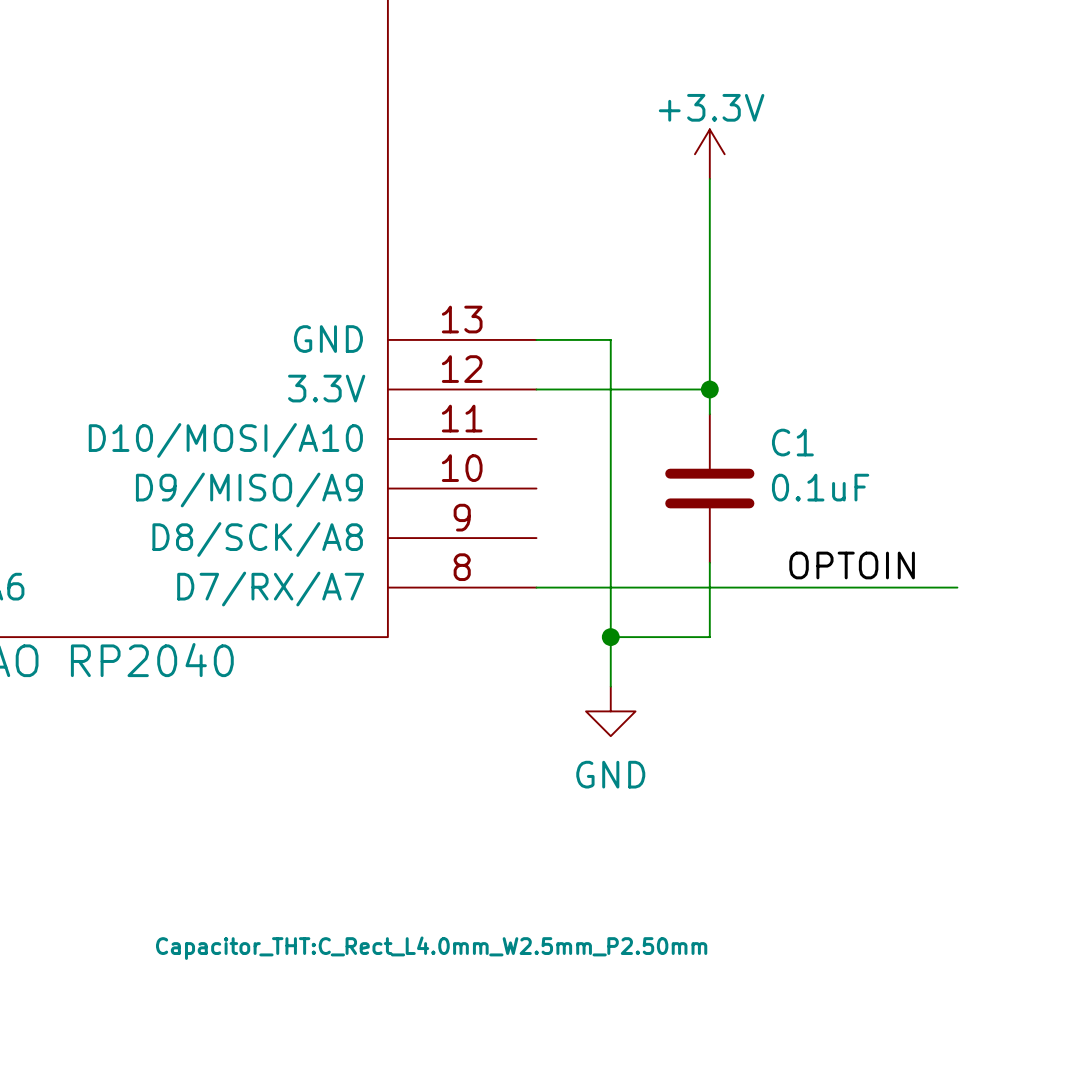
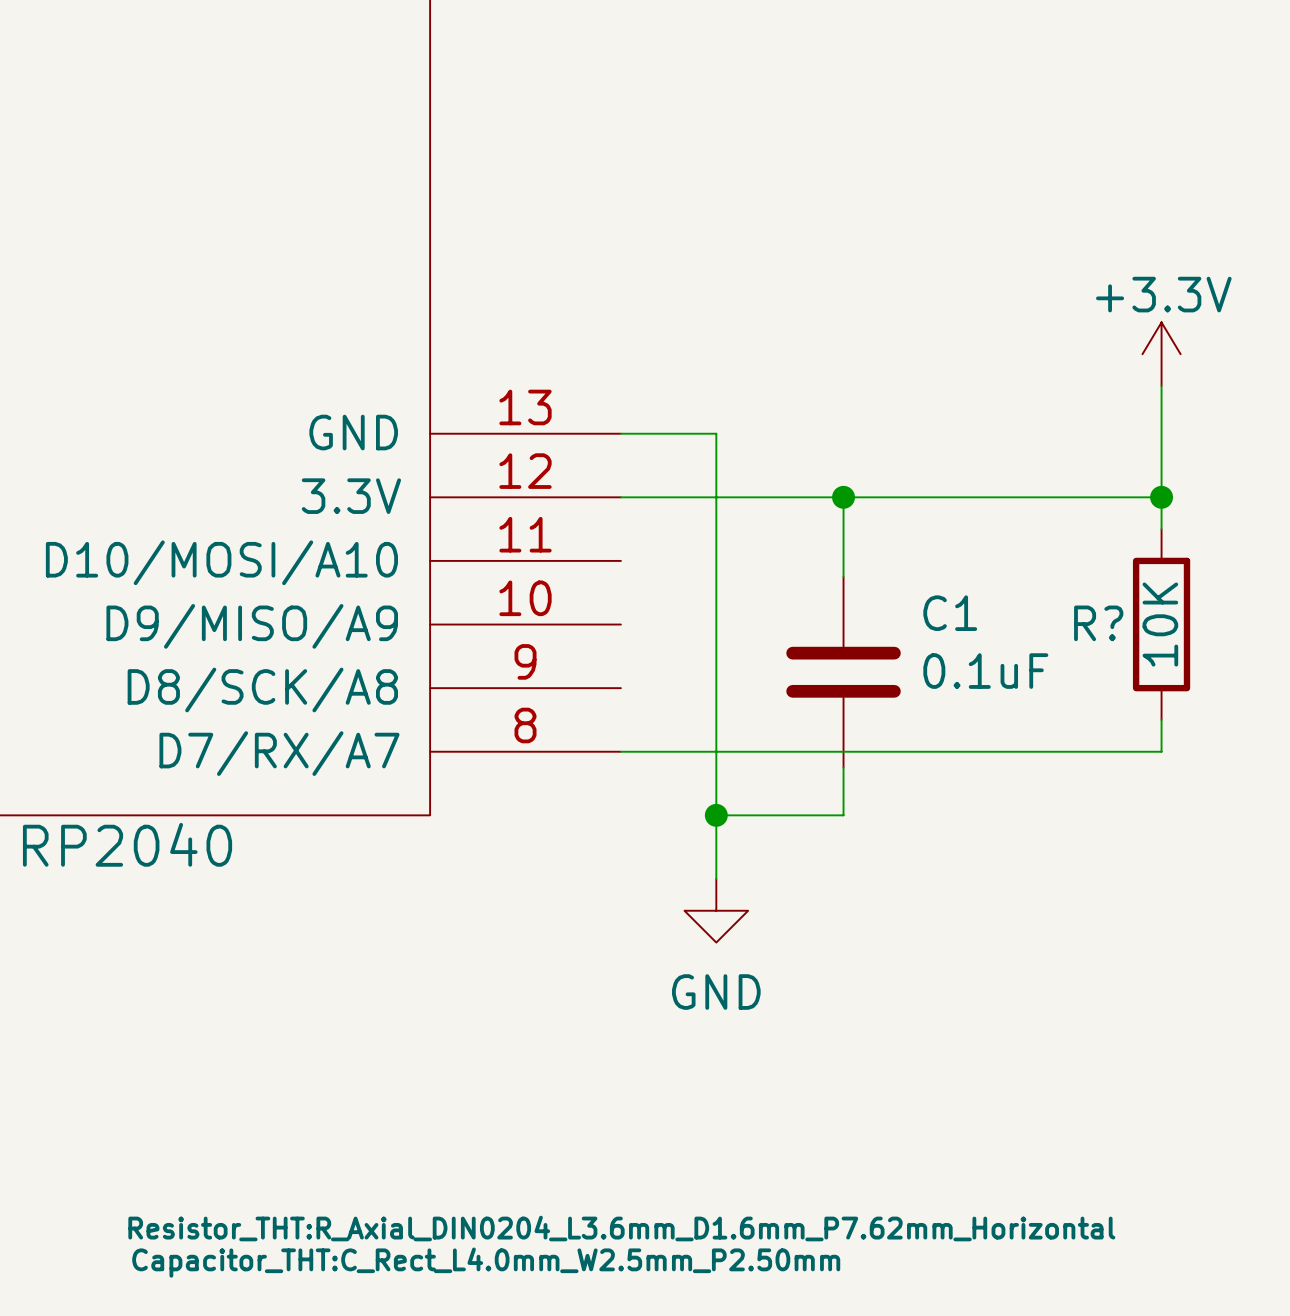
power symbol position: +3.3V (709, 154) -> +3.3V (1161, 354)
wire: (709, 179) (709, 389) -> (1161, 497) (843, 497)
wire: none -> (1161, 386) (1161, 529)
junction: none -> (1161, 497)
C1 position: (709, 488) -> (843, 672)
R?: none -> 10K (1161, 624)
wire: none -> (1161, 719) (1161, 751)
label: OPTOIN (852, 565) -> none

